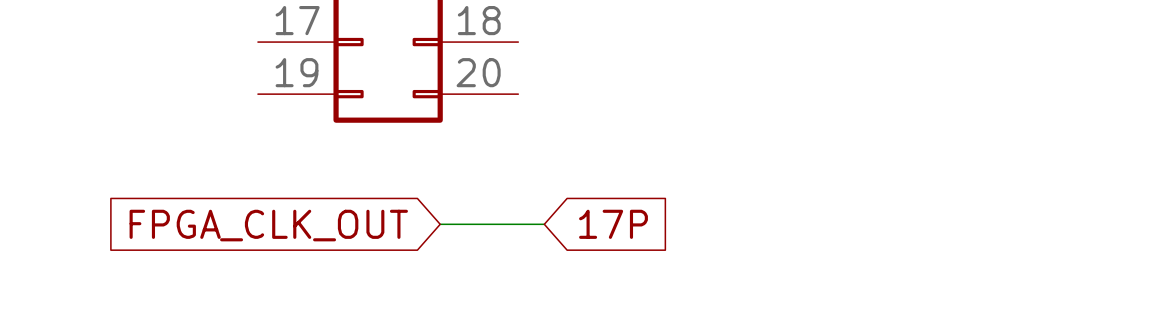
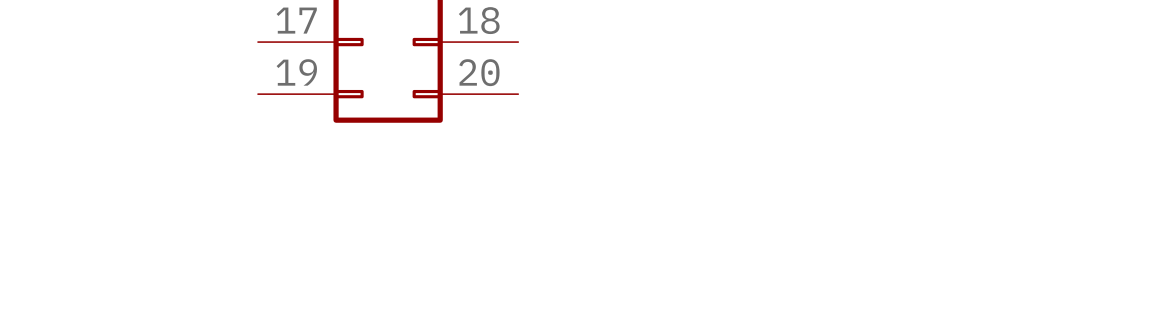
wire: (440, 224) (544, 224) -> none
global label: 17P (613, 224) -> none
global label: FPGA_CLK_OUT (268, 225) -> none

